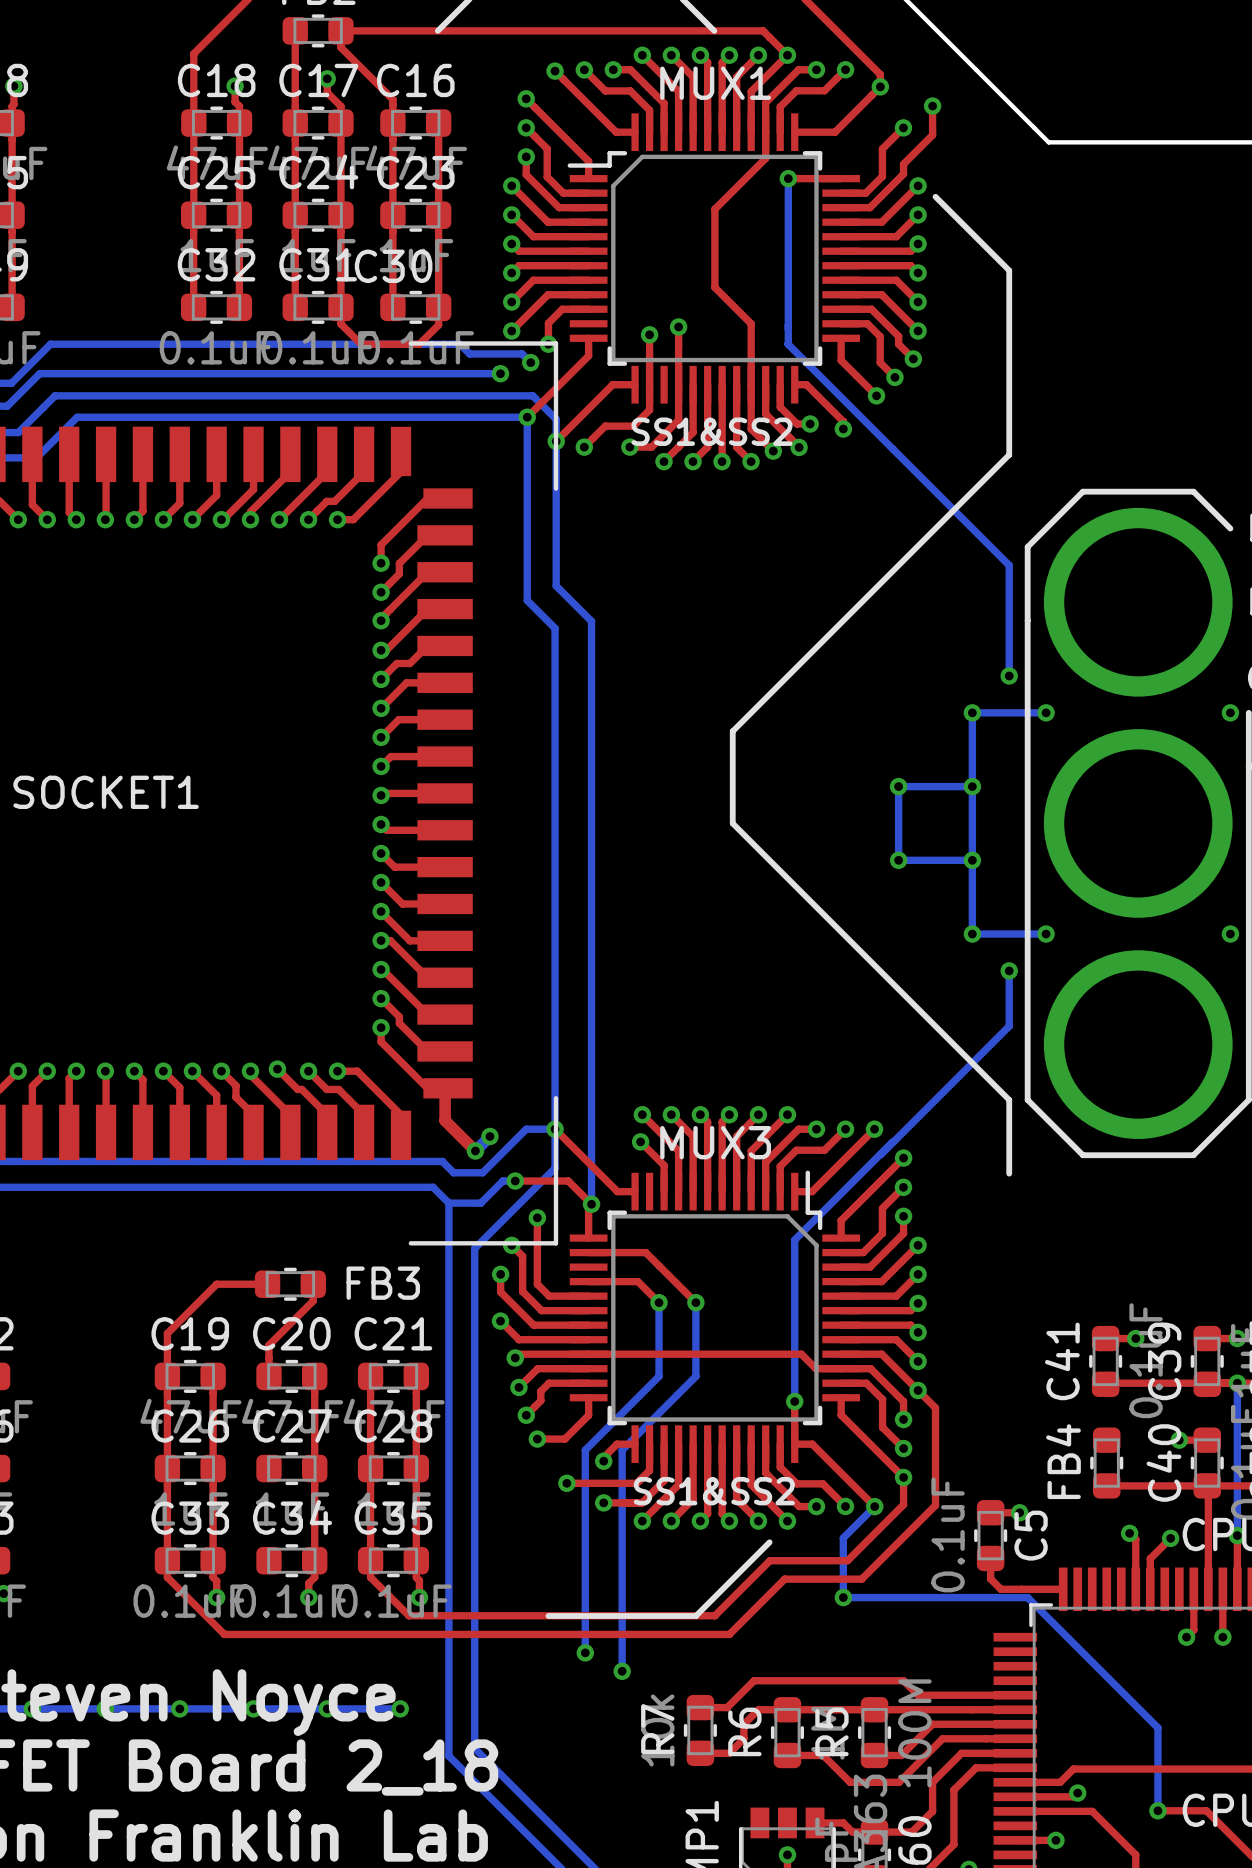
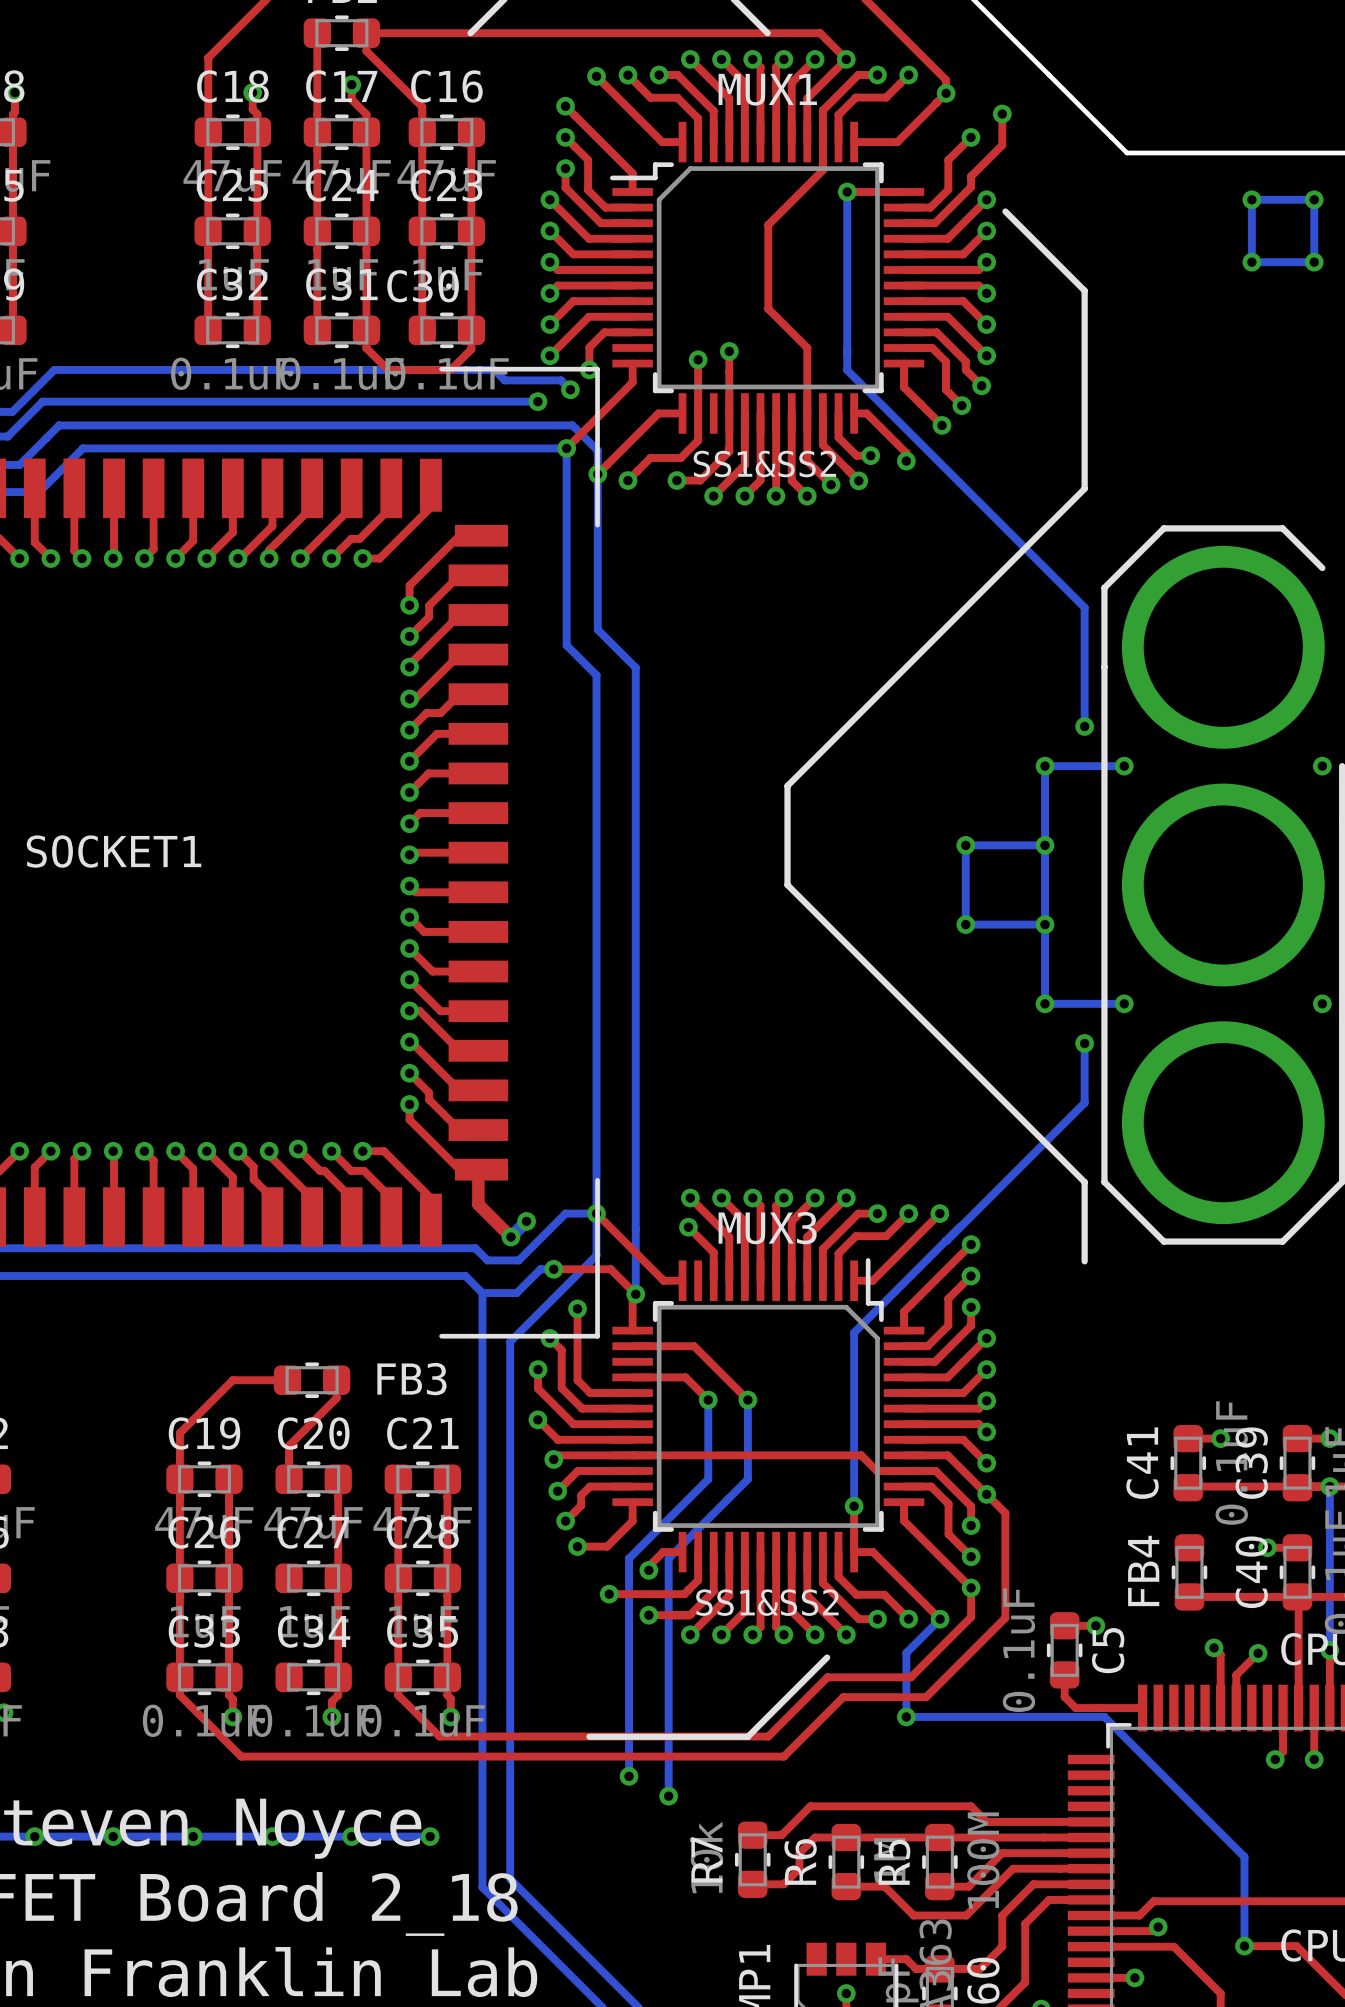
bottom track: none -> (1251, 199) (1314, 199) (1314, 262) (1251, 262) (1251, 199)
via: none -> (1251, 199)
via: none -> (1314, 199)
via: none -> (1251, 262)
via: none -> (1314, 262)

